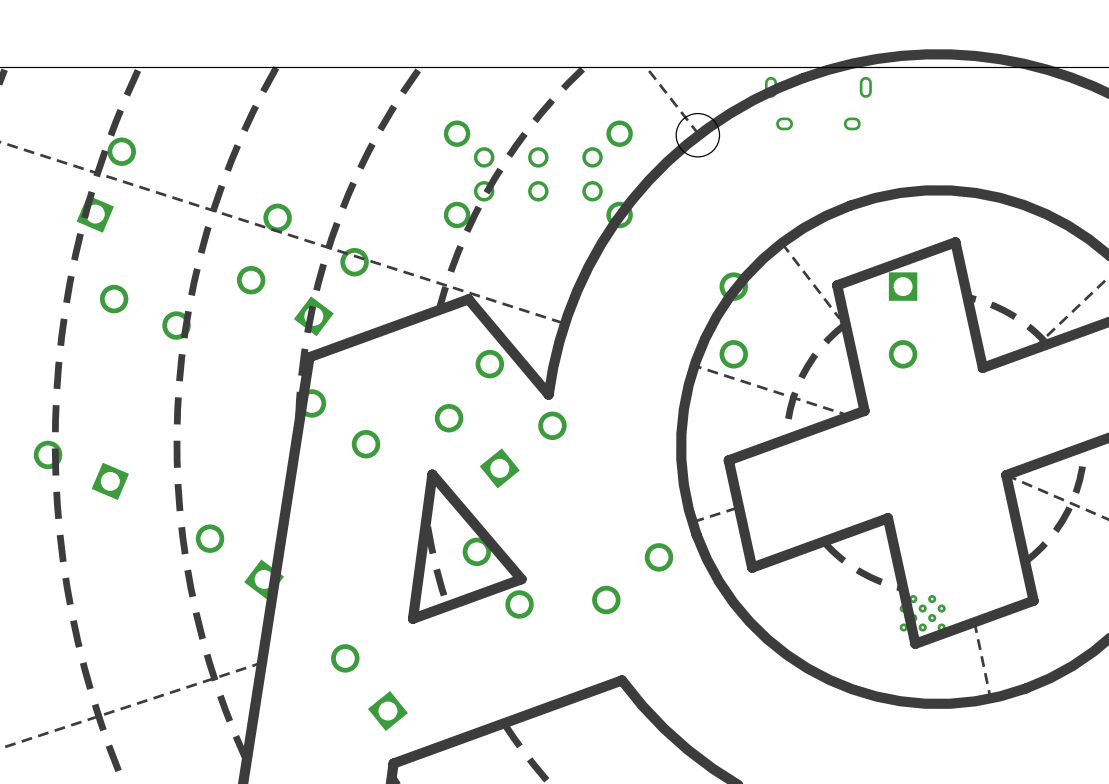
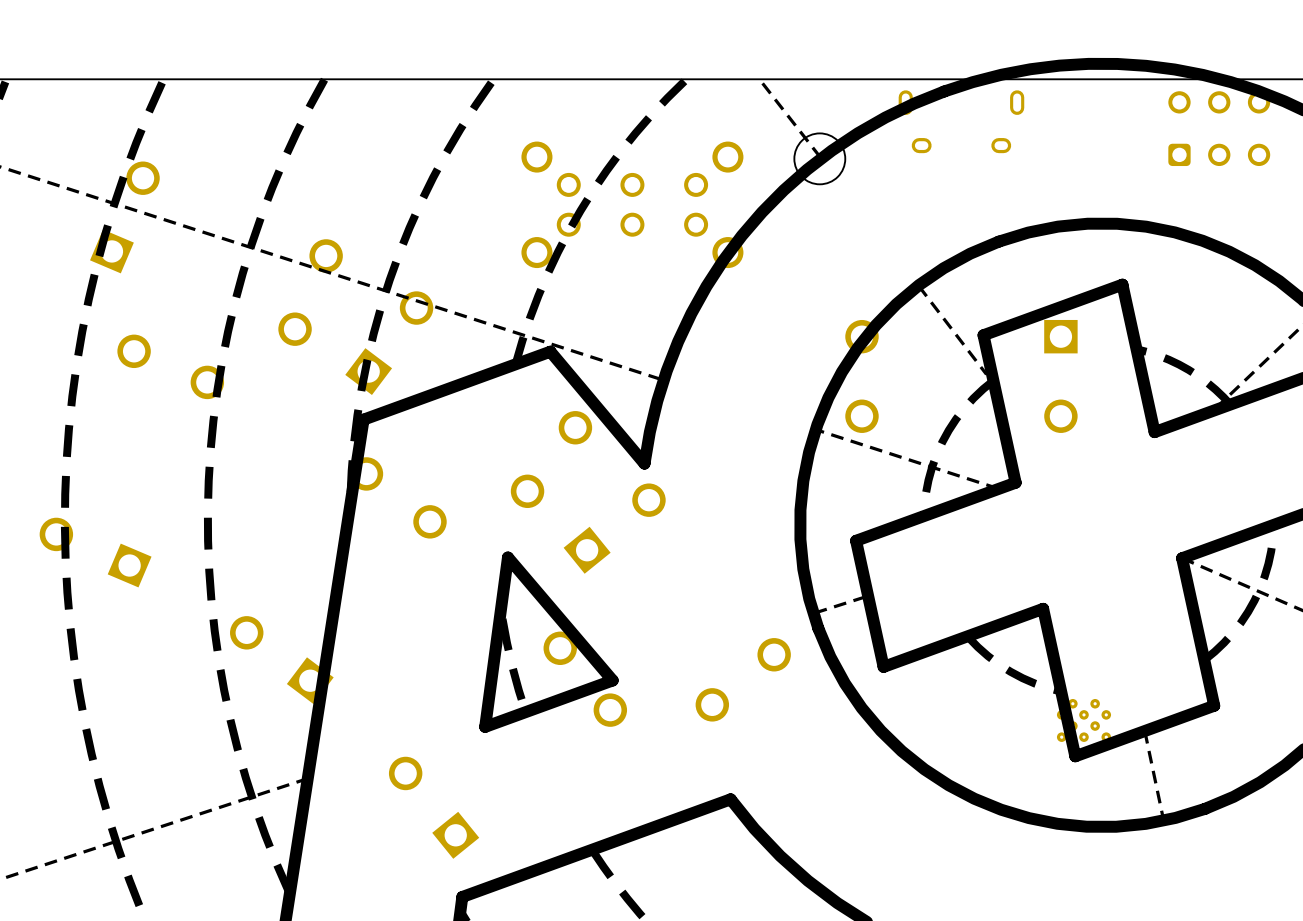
part: none -> (1219, 128)

